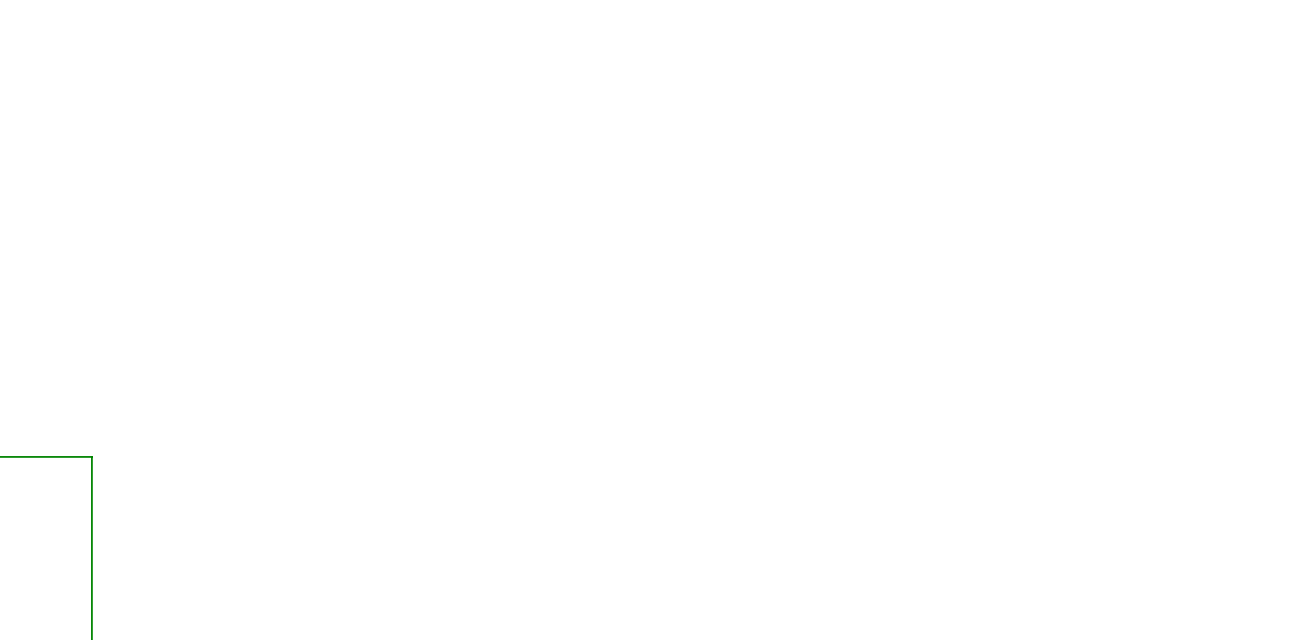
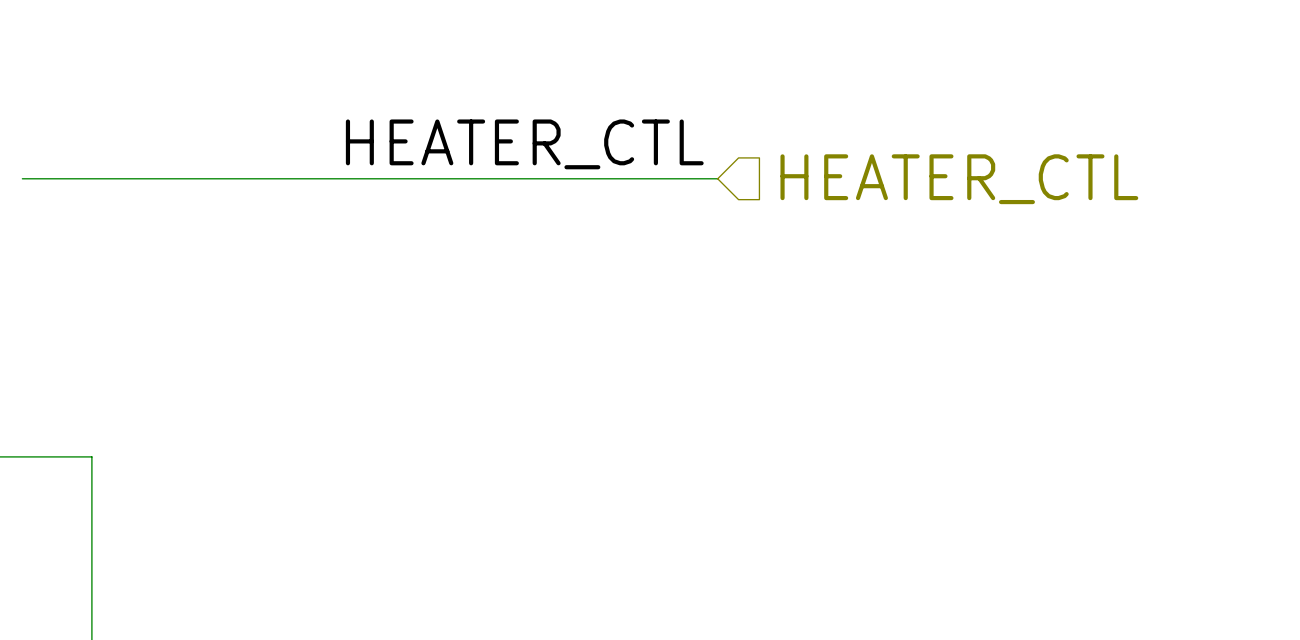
label: none -> HEATER_CTL (524, 144)
wire: none -> (22, 178) (717, 178)
hierarchical label: none -> HEATER_CTL (959, 179)

